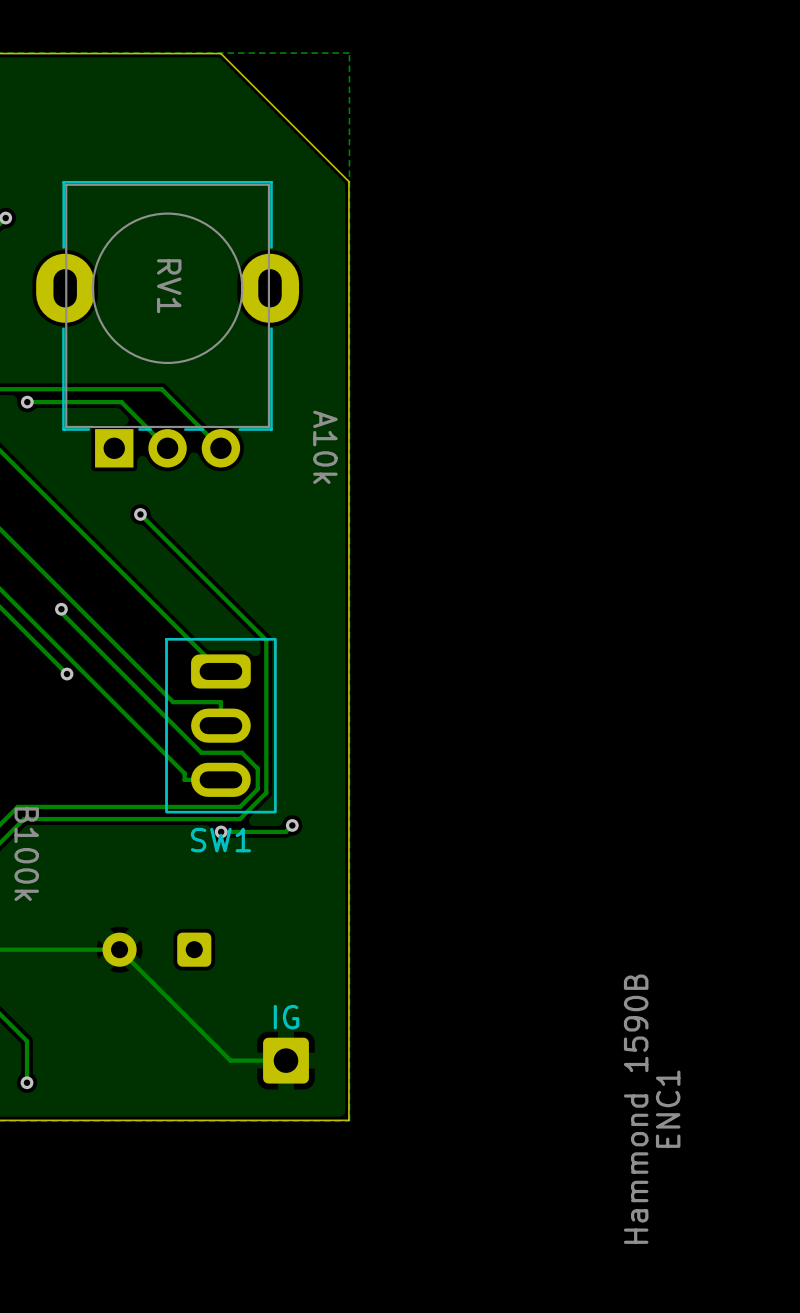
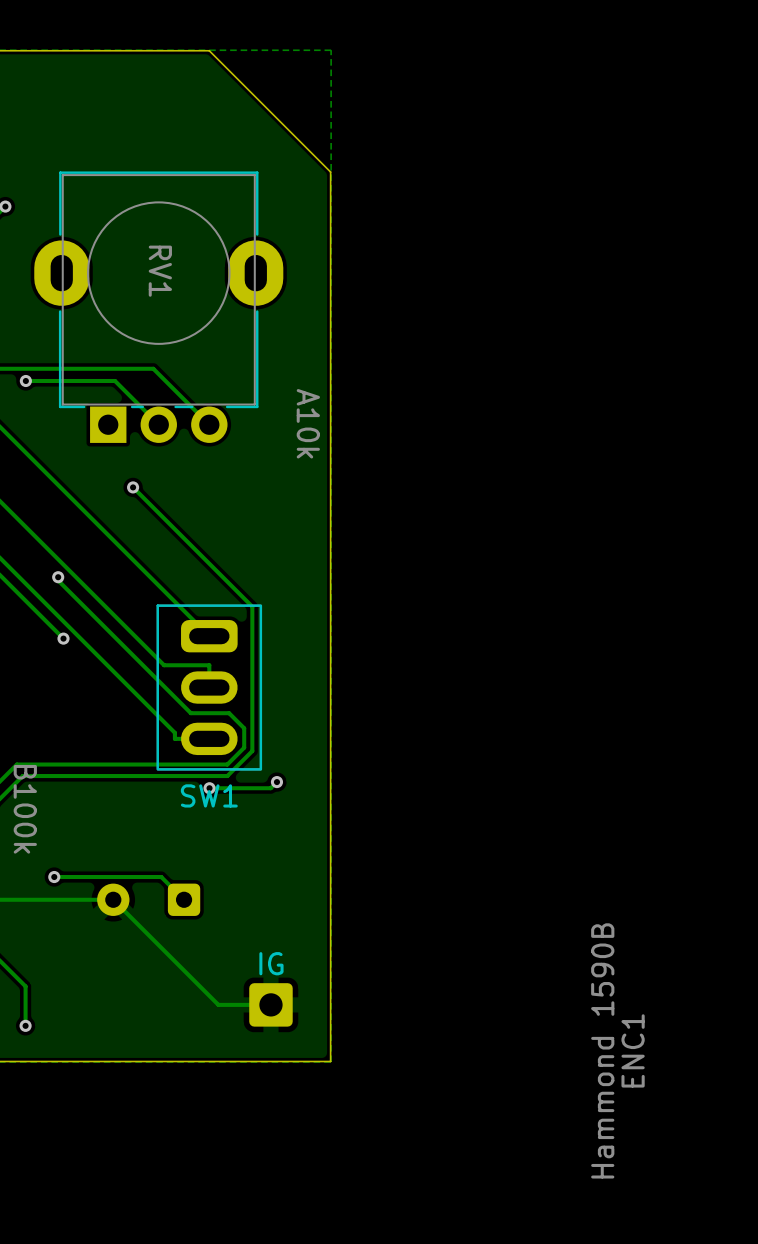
track: none -> (54, 877) (161, 877) (184, 899)
via: none -> (54, 877)

